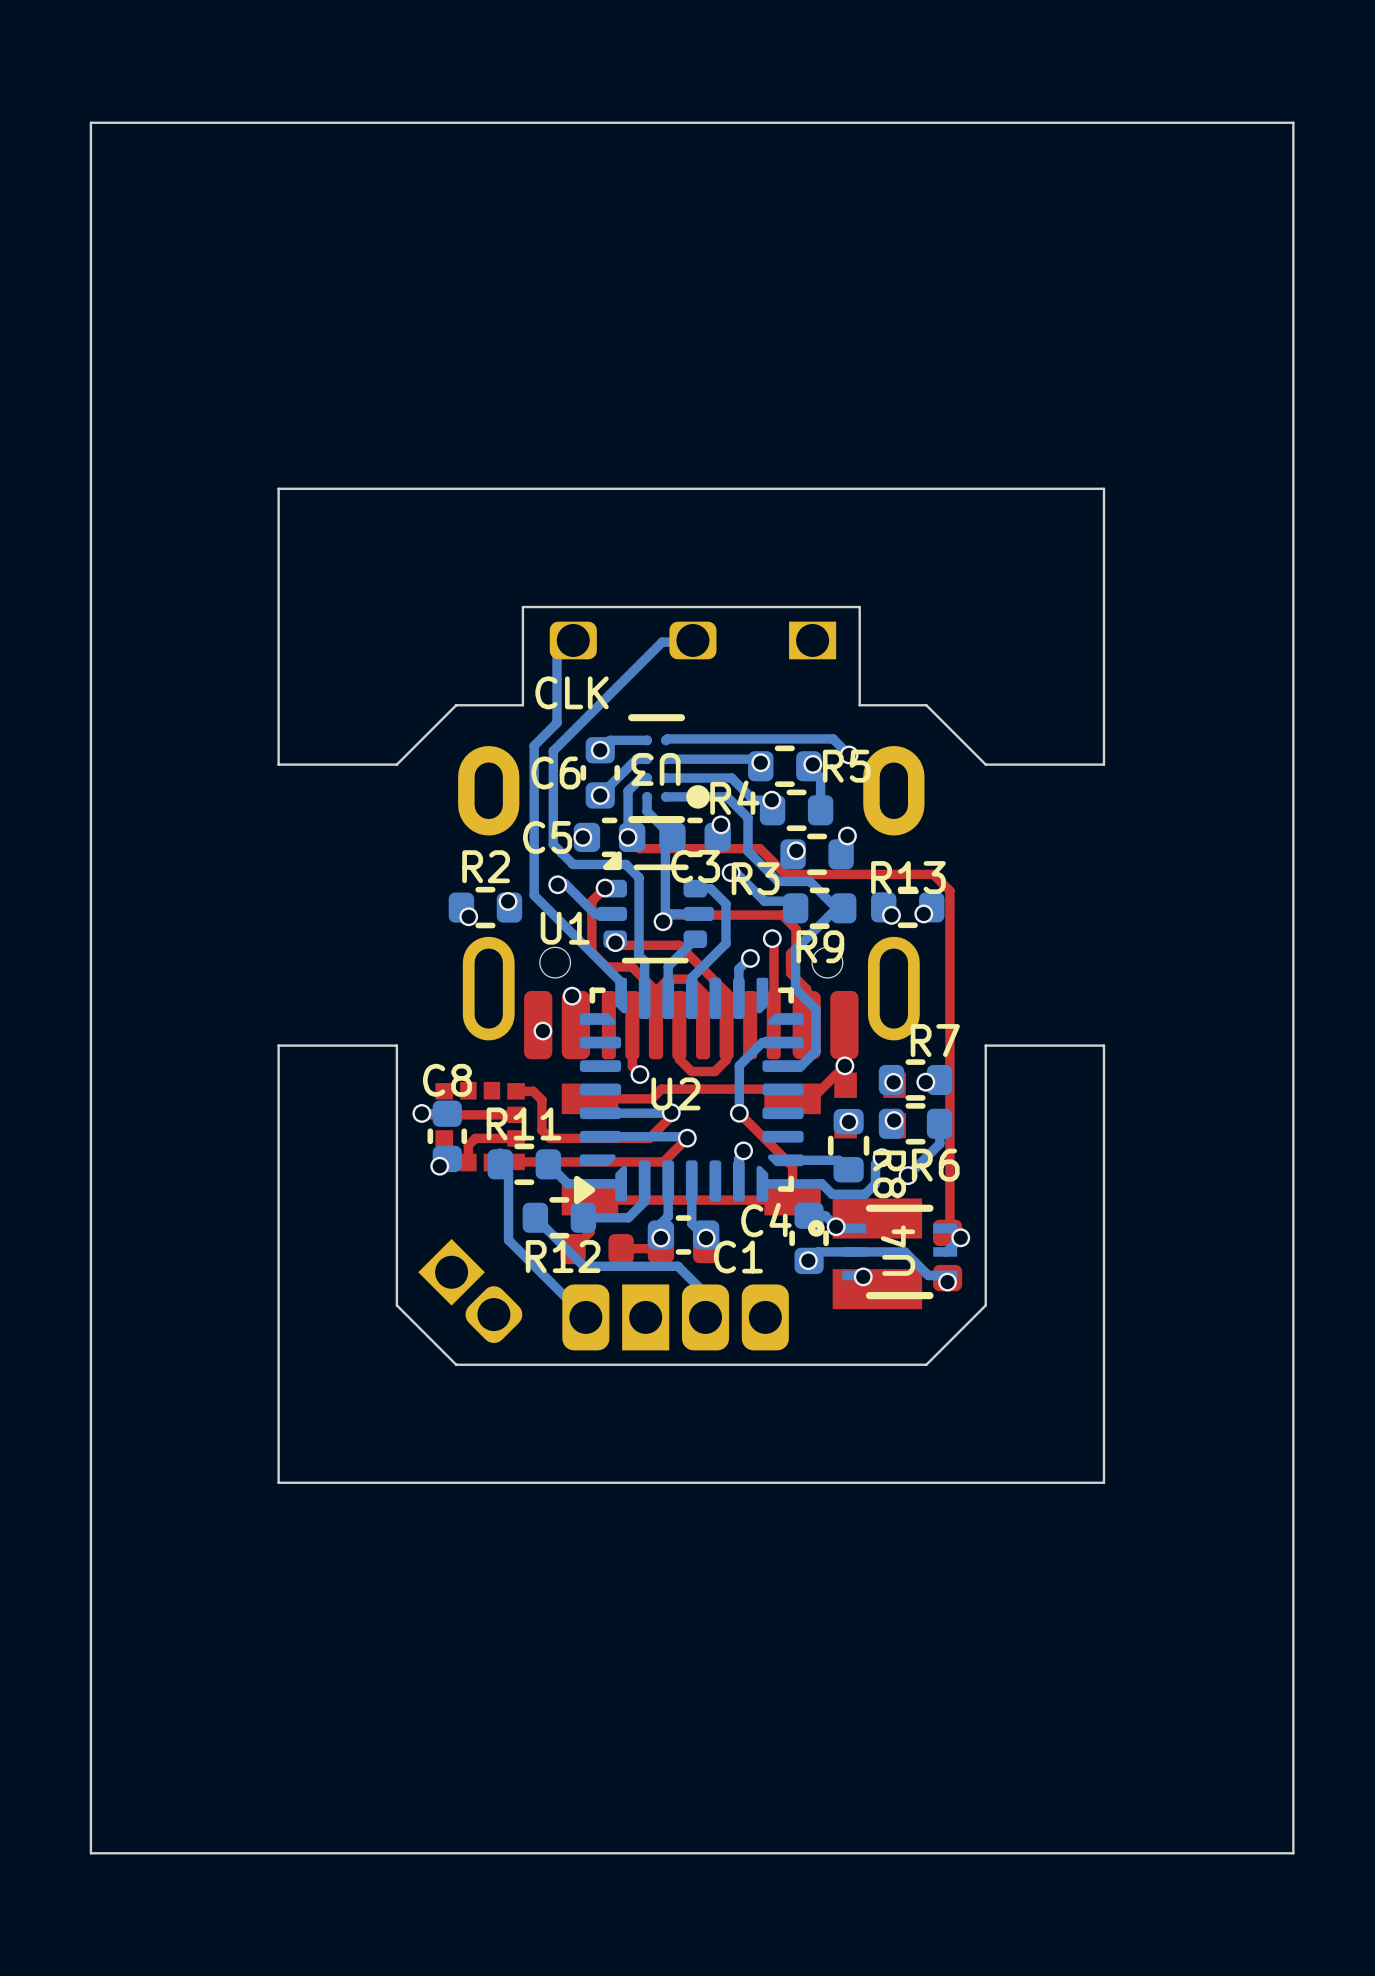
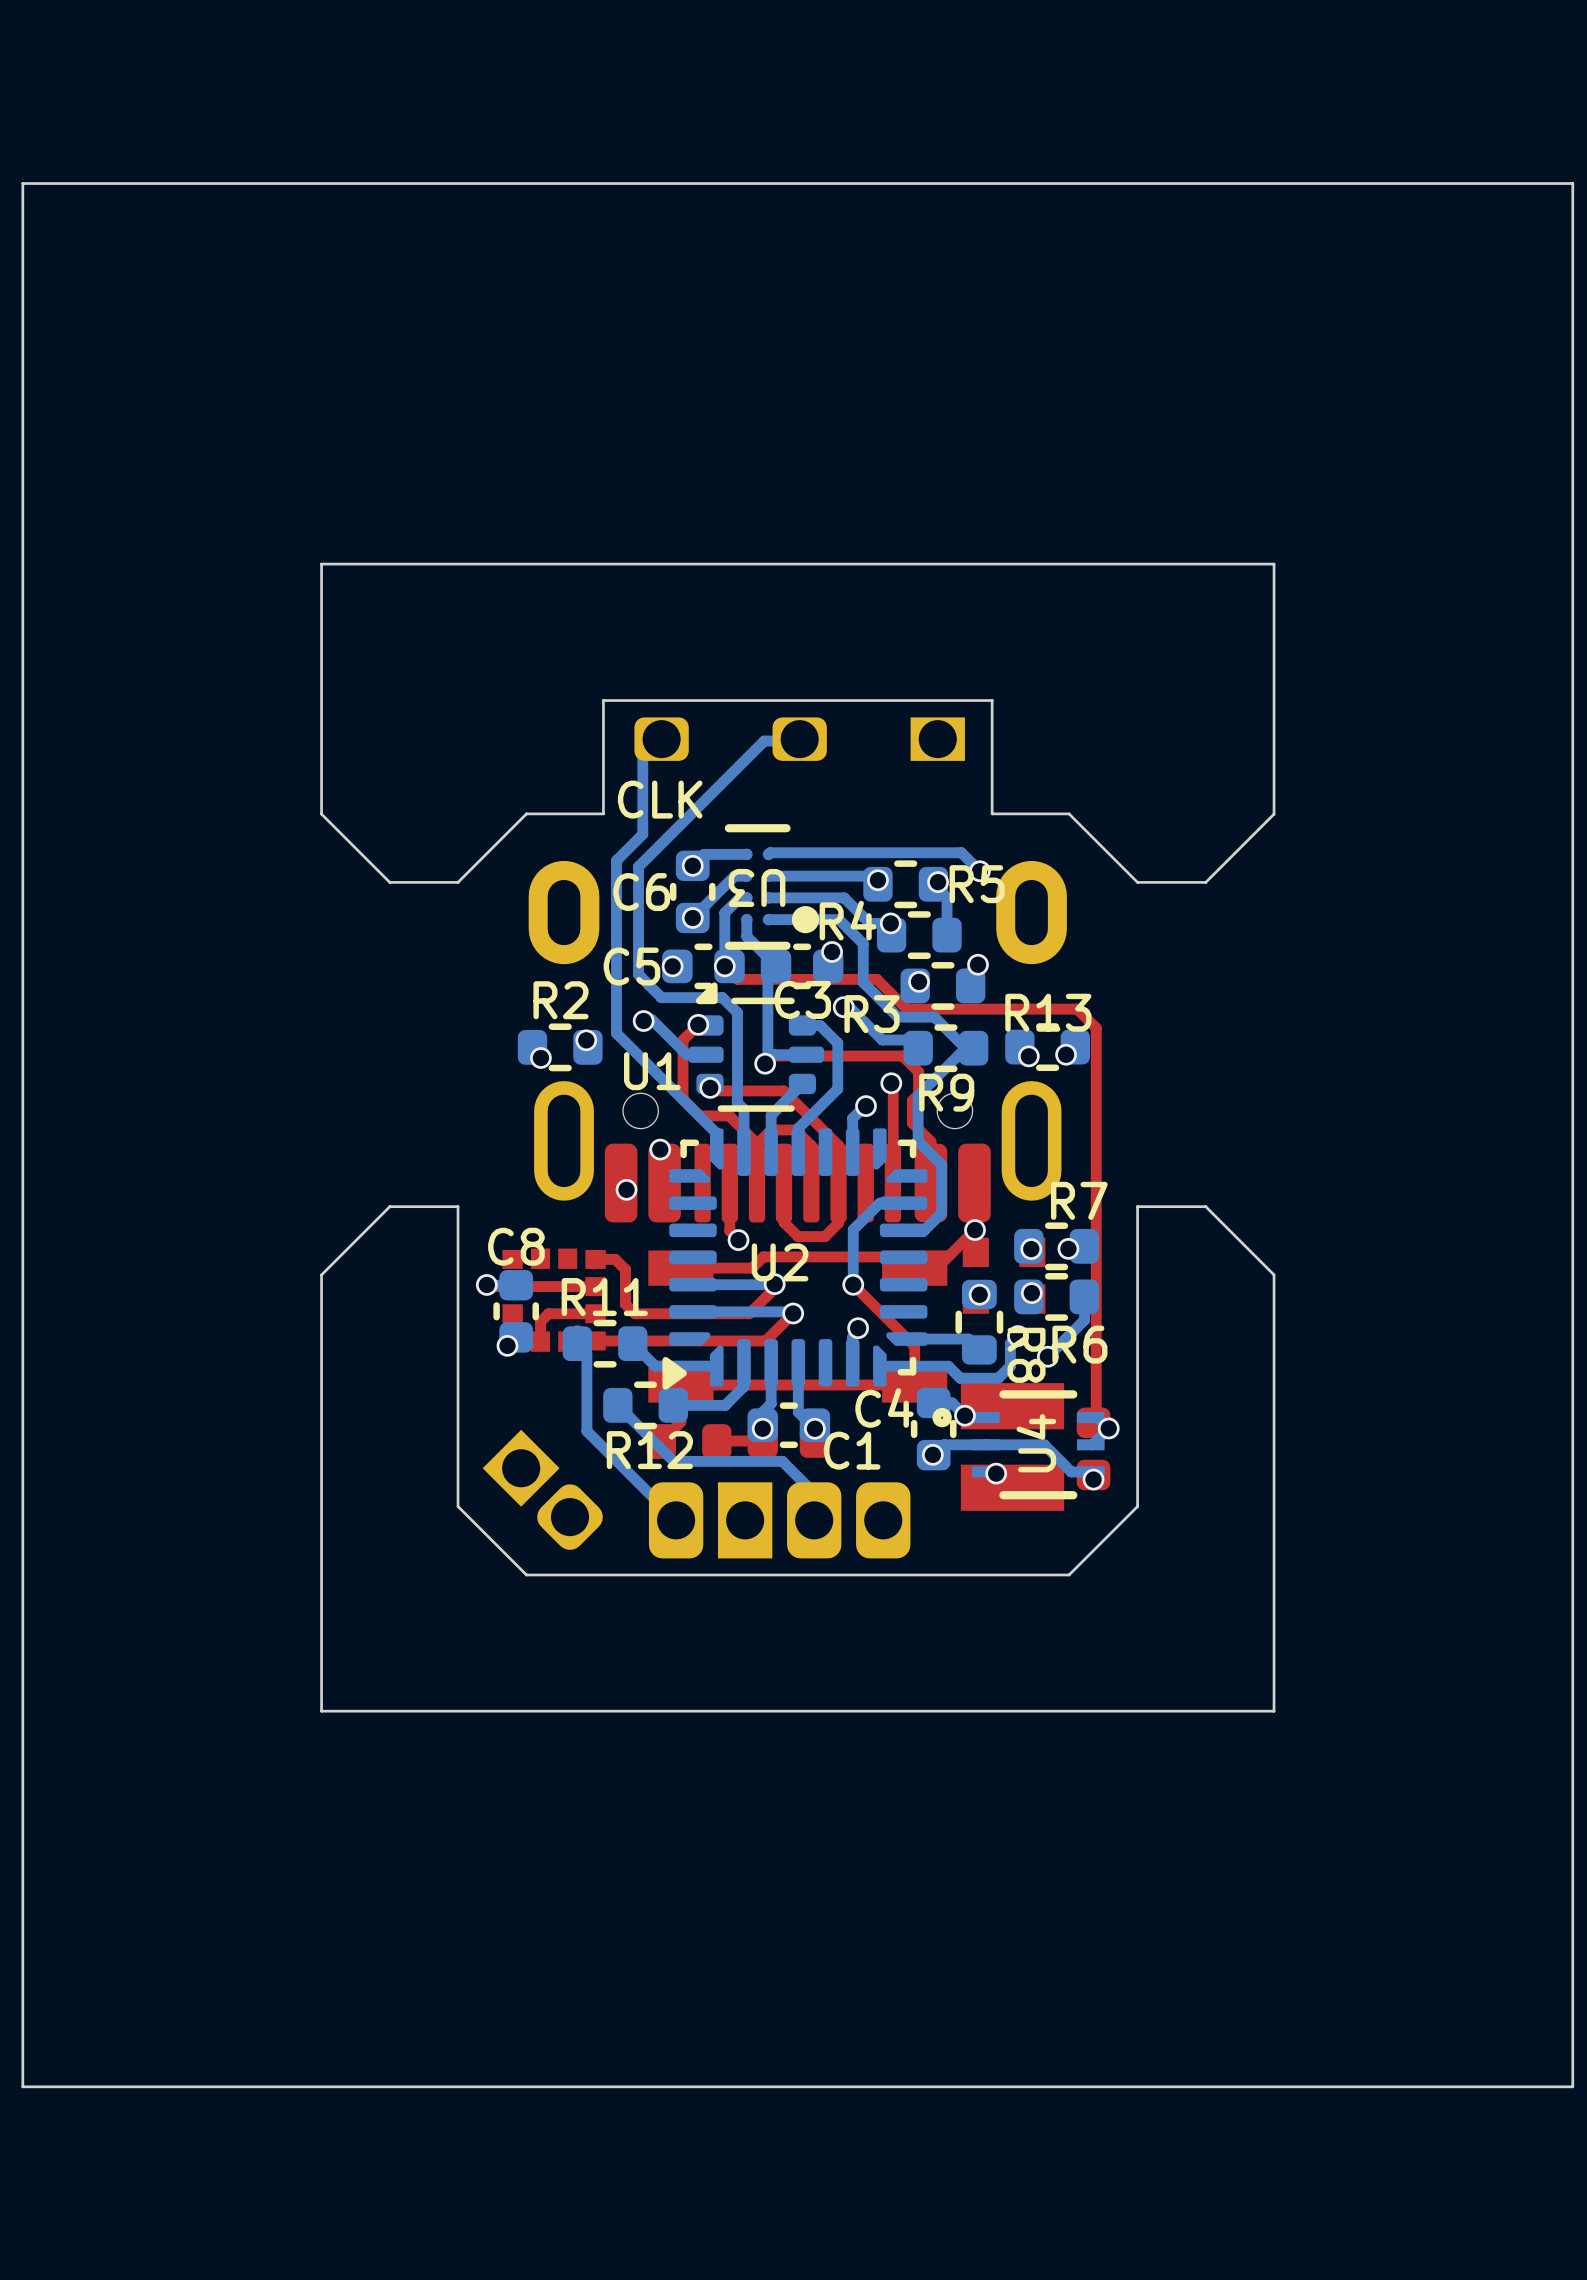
board edge: (1293, 122) (90, 122) (90, 1853) (1293, 1853) (1293, 122) -> (1572, 183) (1572, 2086) (22, 2086) (22, 183) (1572, 183)
board edge: (278, 705) (278, 764) (337, 764) -> (321, 813) (389, 882)
board edge: (1103, 705) (1103, 764) (1044, 764) -> (1274, 814) (1205, 882)
board edge: (337, 1045) (278, 1045) (278, 1104) -> (389, 1206) (321, 1274)
board edge: (1044, 1045) (1103, 1045) (1103, 1104) -> (1205, 1206) (1274, 1274)

